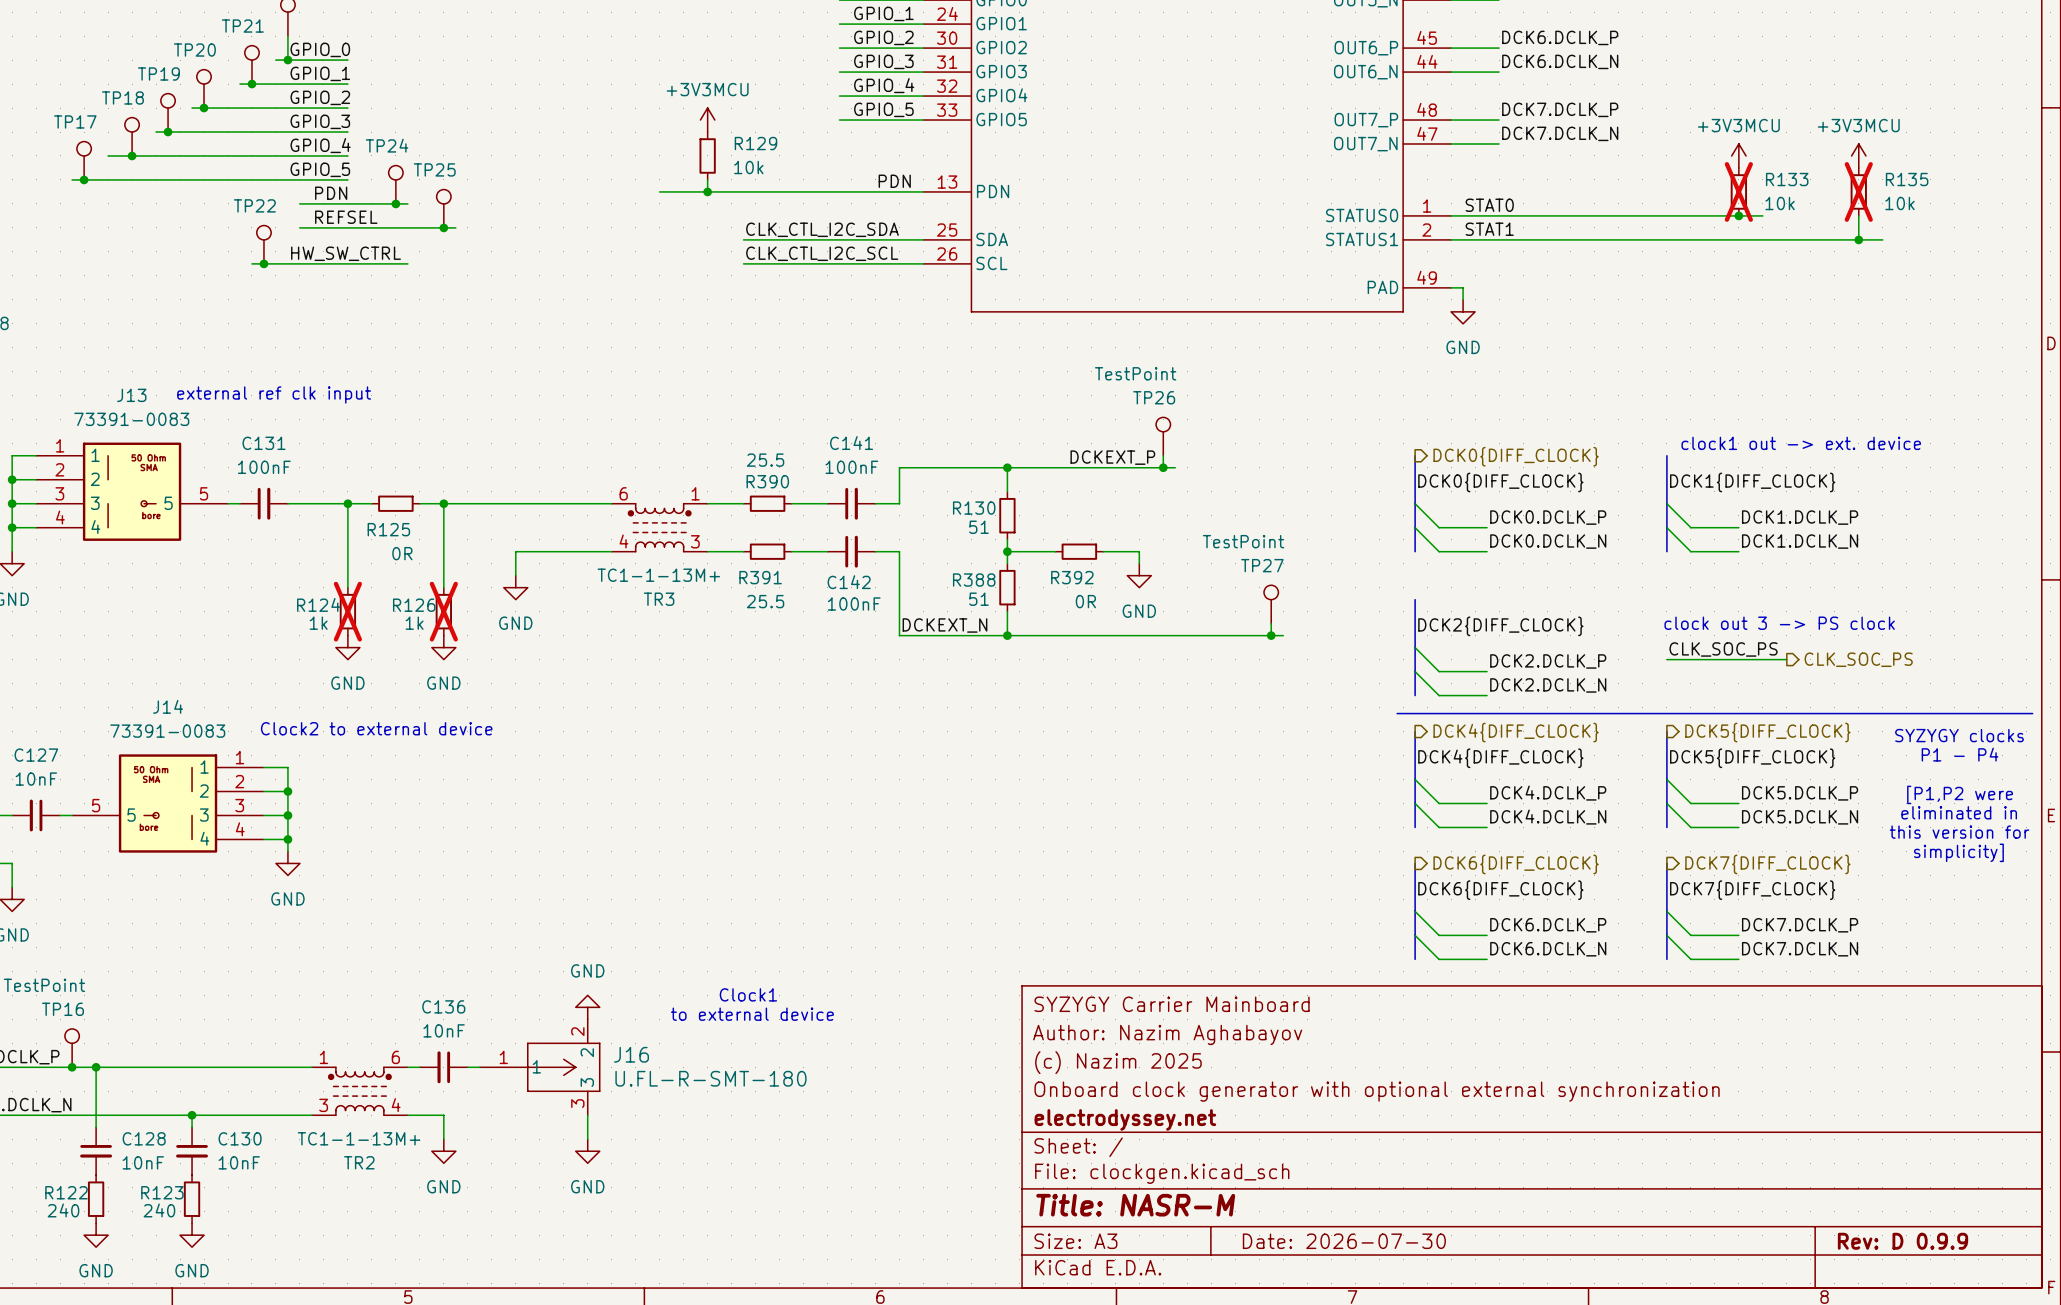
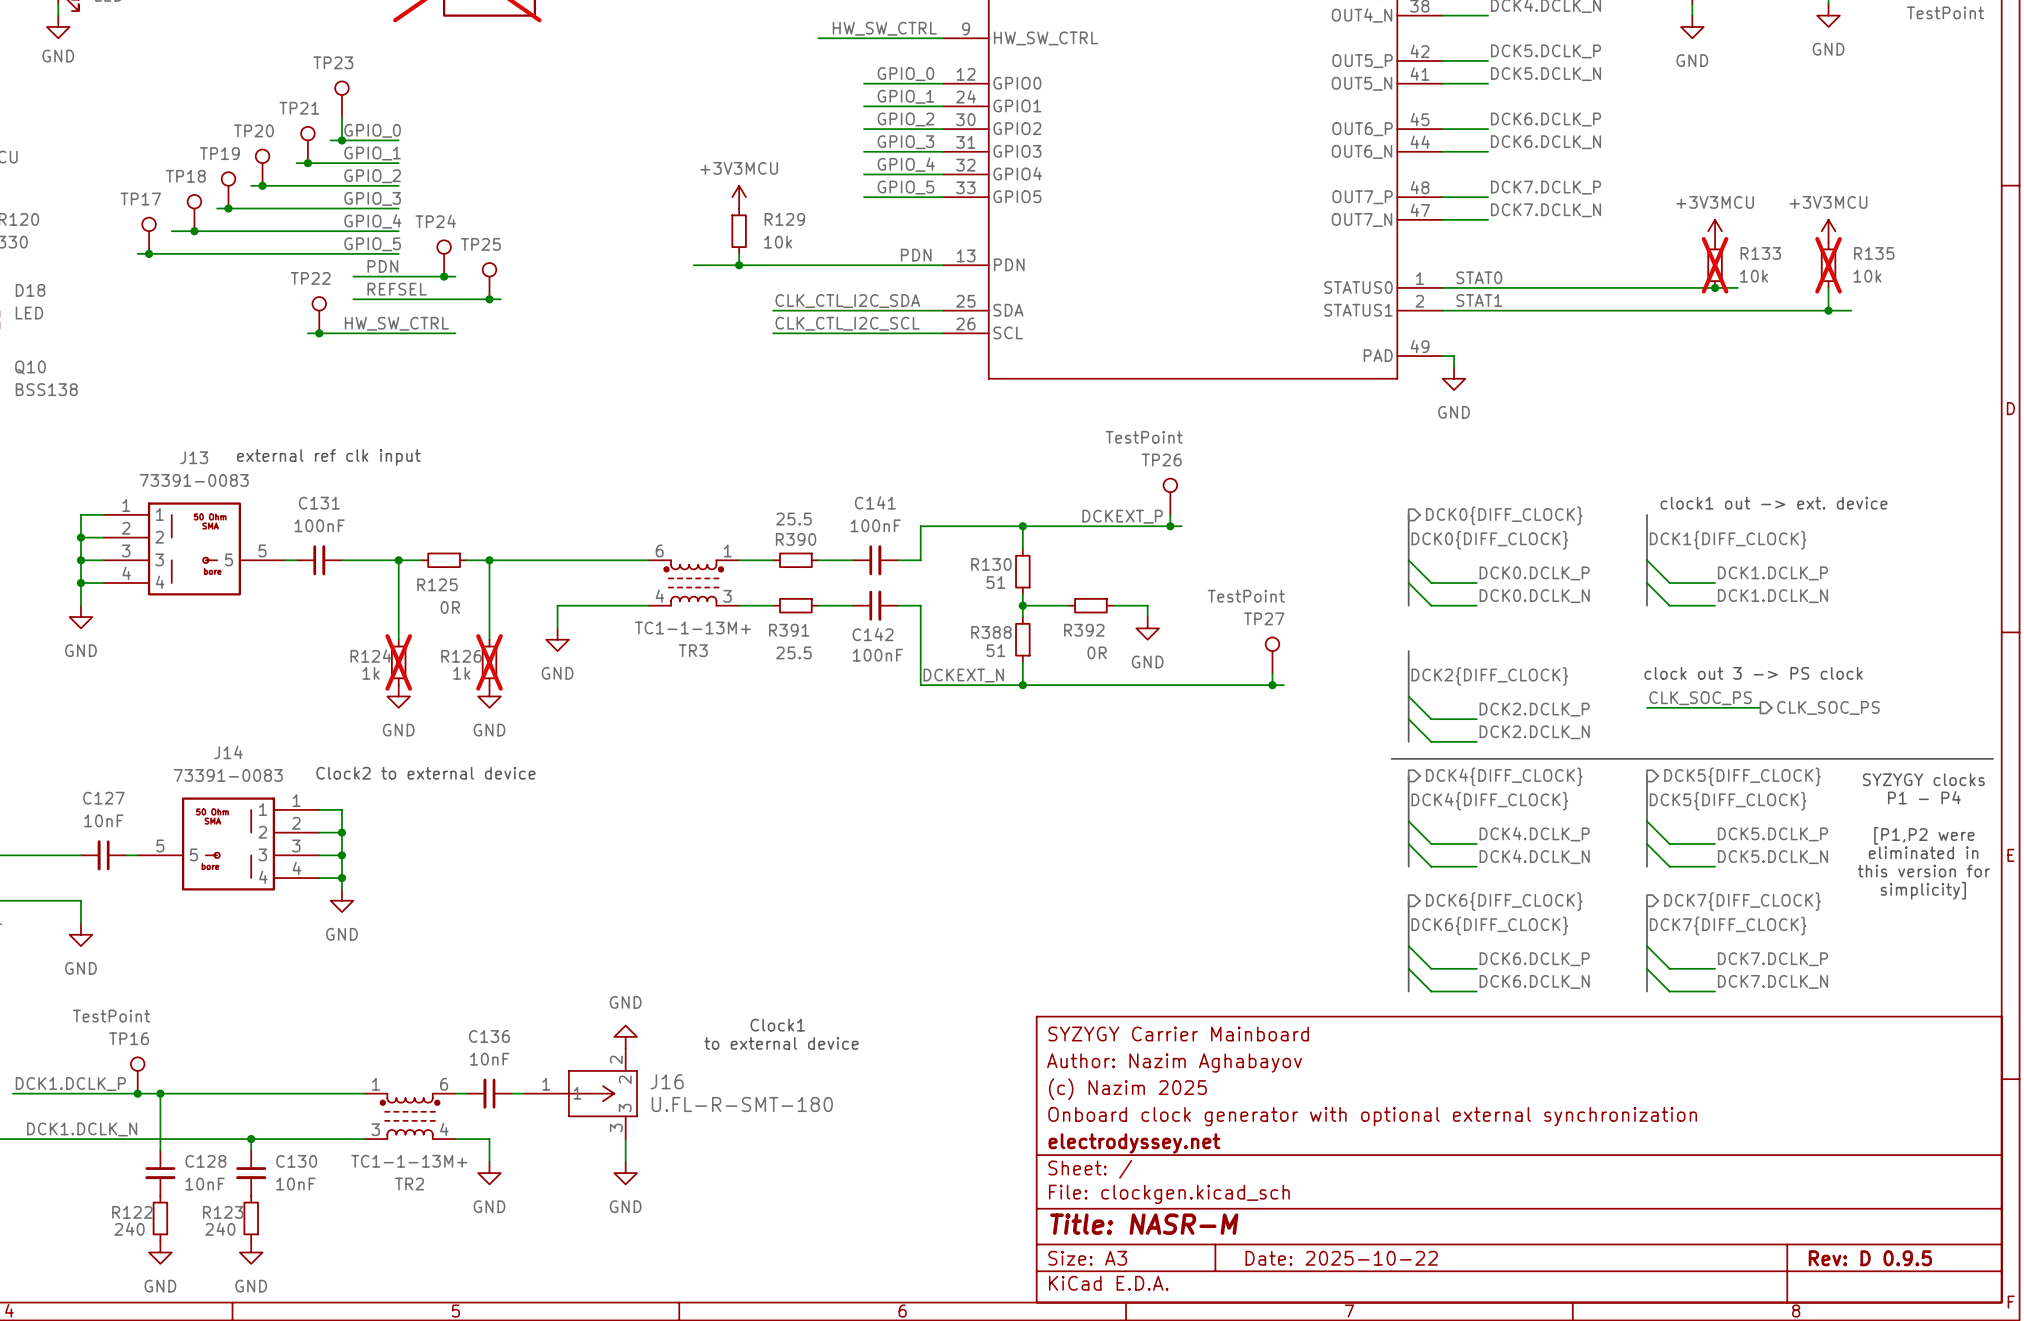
title block: Date: 2026-07-30 (1344, 1241) -> Date: 2025-10-22 (1341, 1258)
title block: Rev: D 0.9.9 (1903, 1241) -> Rev: D 0.9.5 (1870, 1258)

